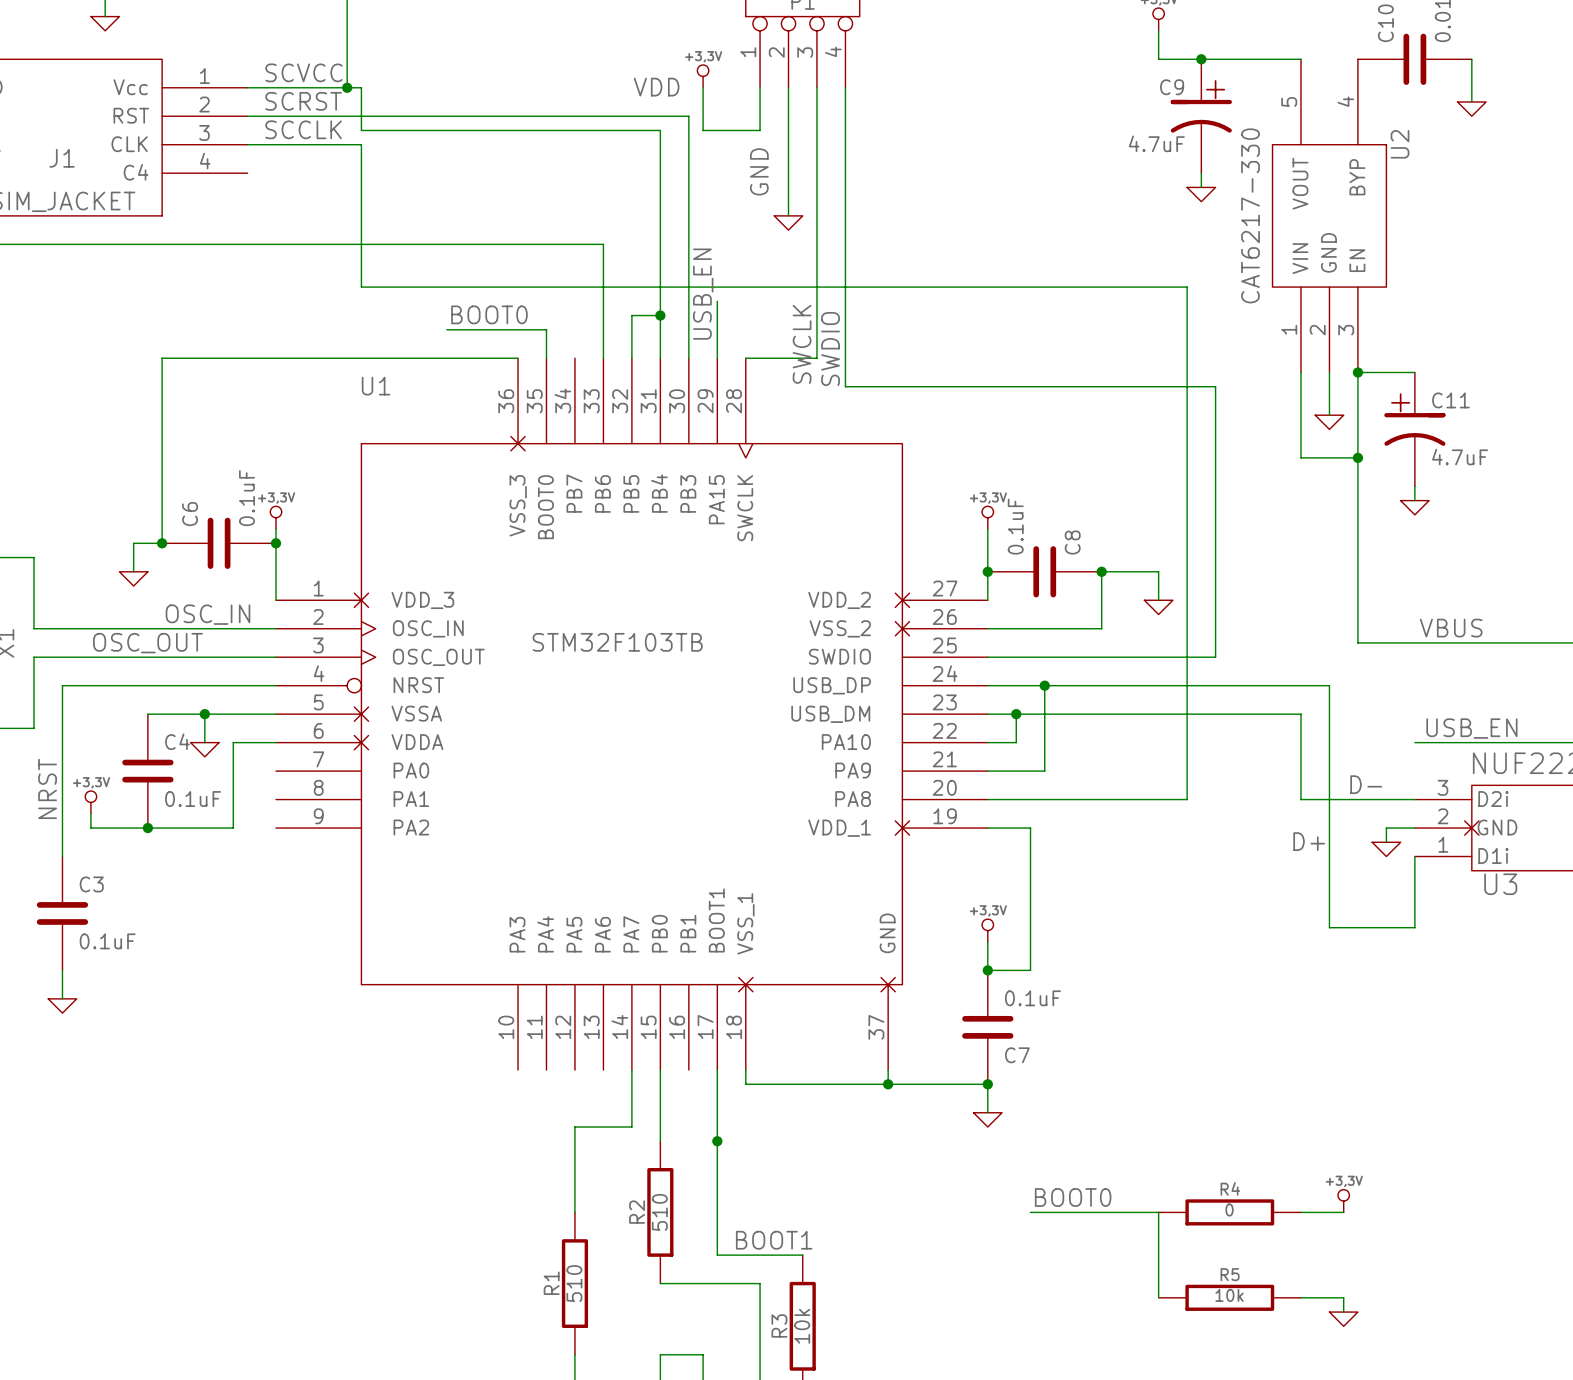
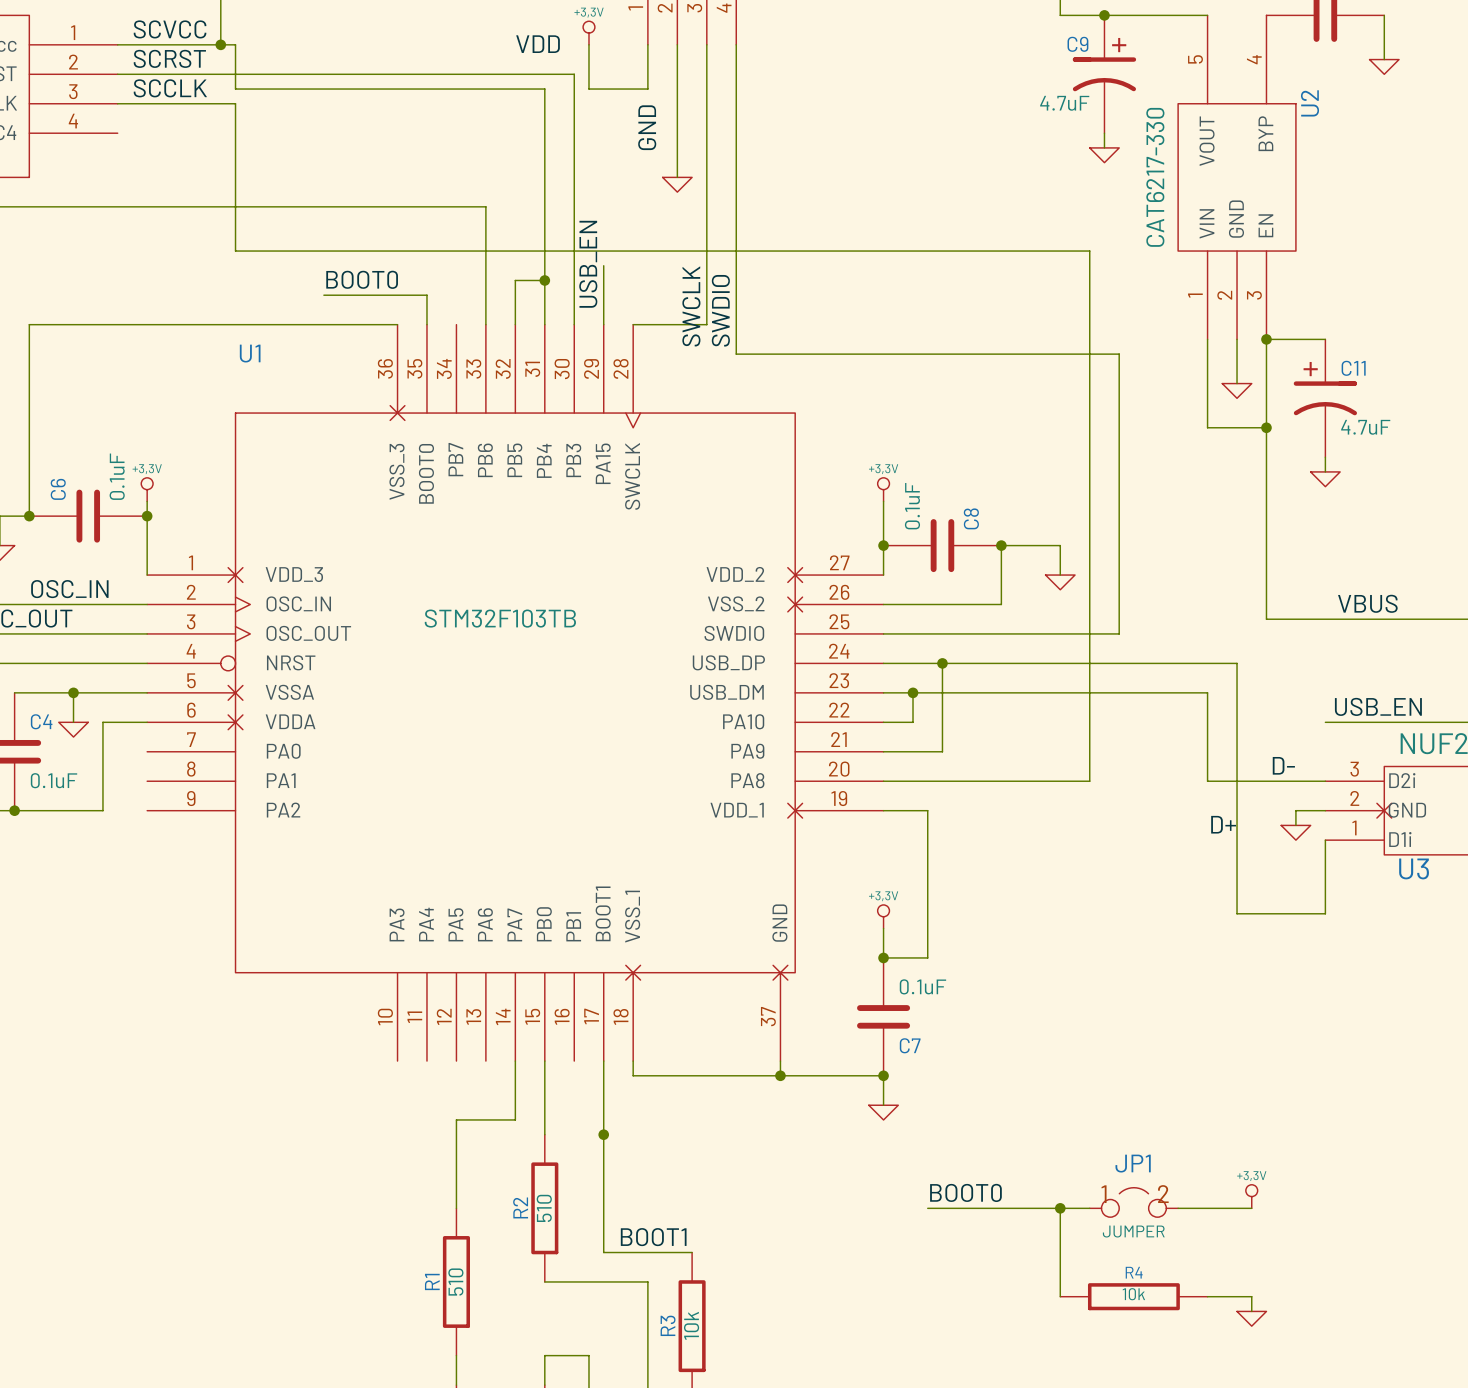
JP1: none -> JUMPER (1133, 1202)
junction: none -> (1060, 1208)
R4: 0 (1229, 1212) -> none
R5 name: R5 (1230, 1274) -> R4 (1134, 1272)

